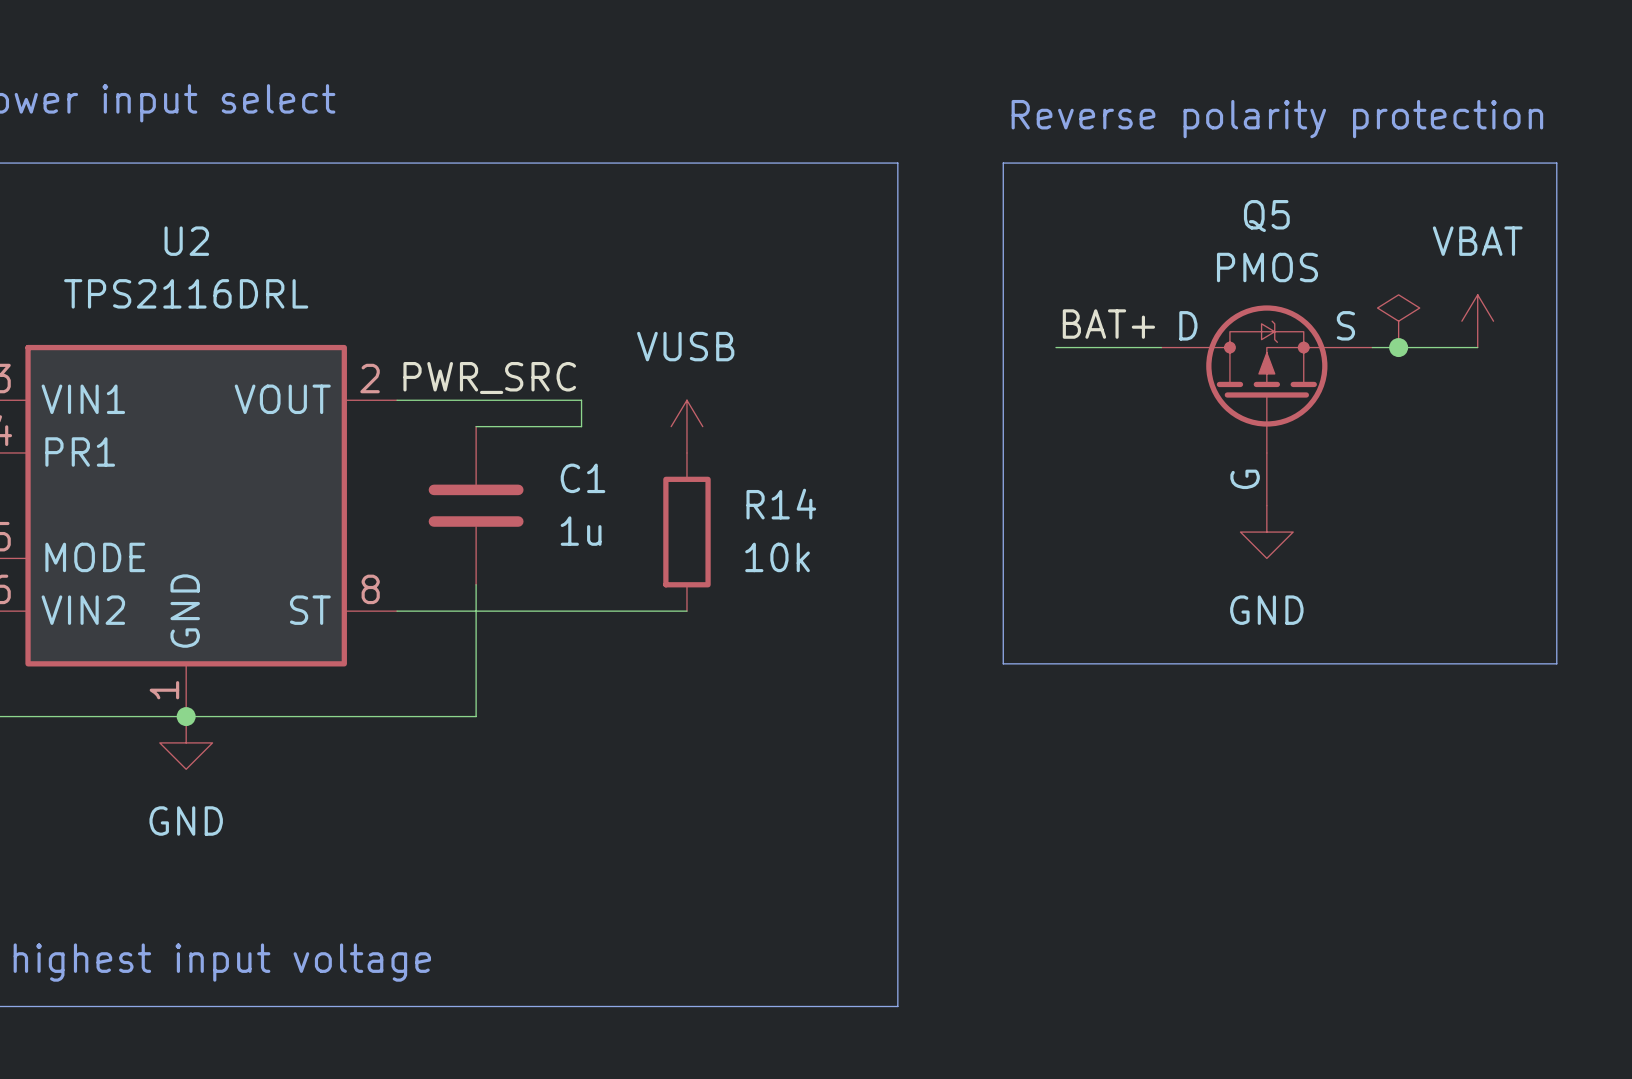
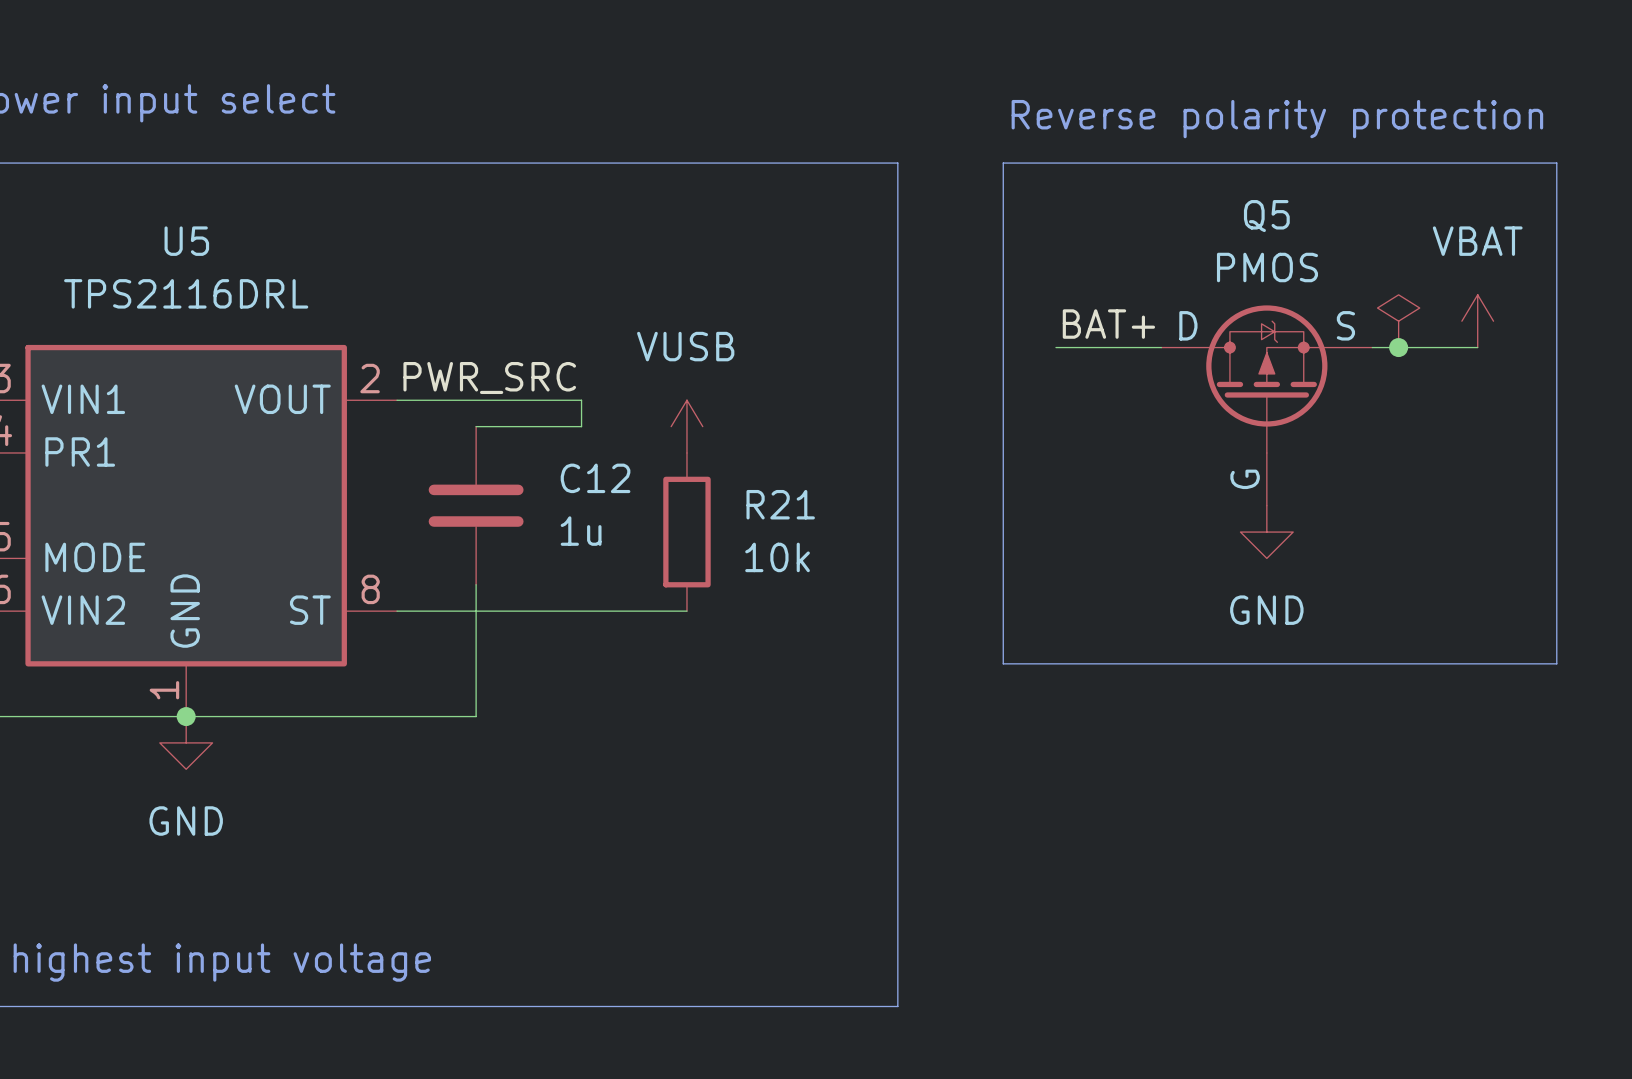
U2 name: U2 (186, 241) -> U5 (186, 241)
C1 name: C1 (582, 478) -> C12 (595, 478)
R14 name: R14 (781, 504) -> R21 (780, 504)

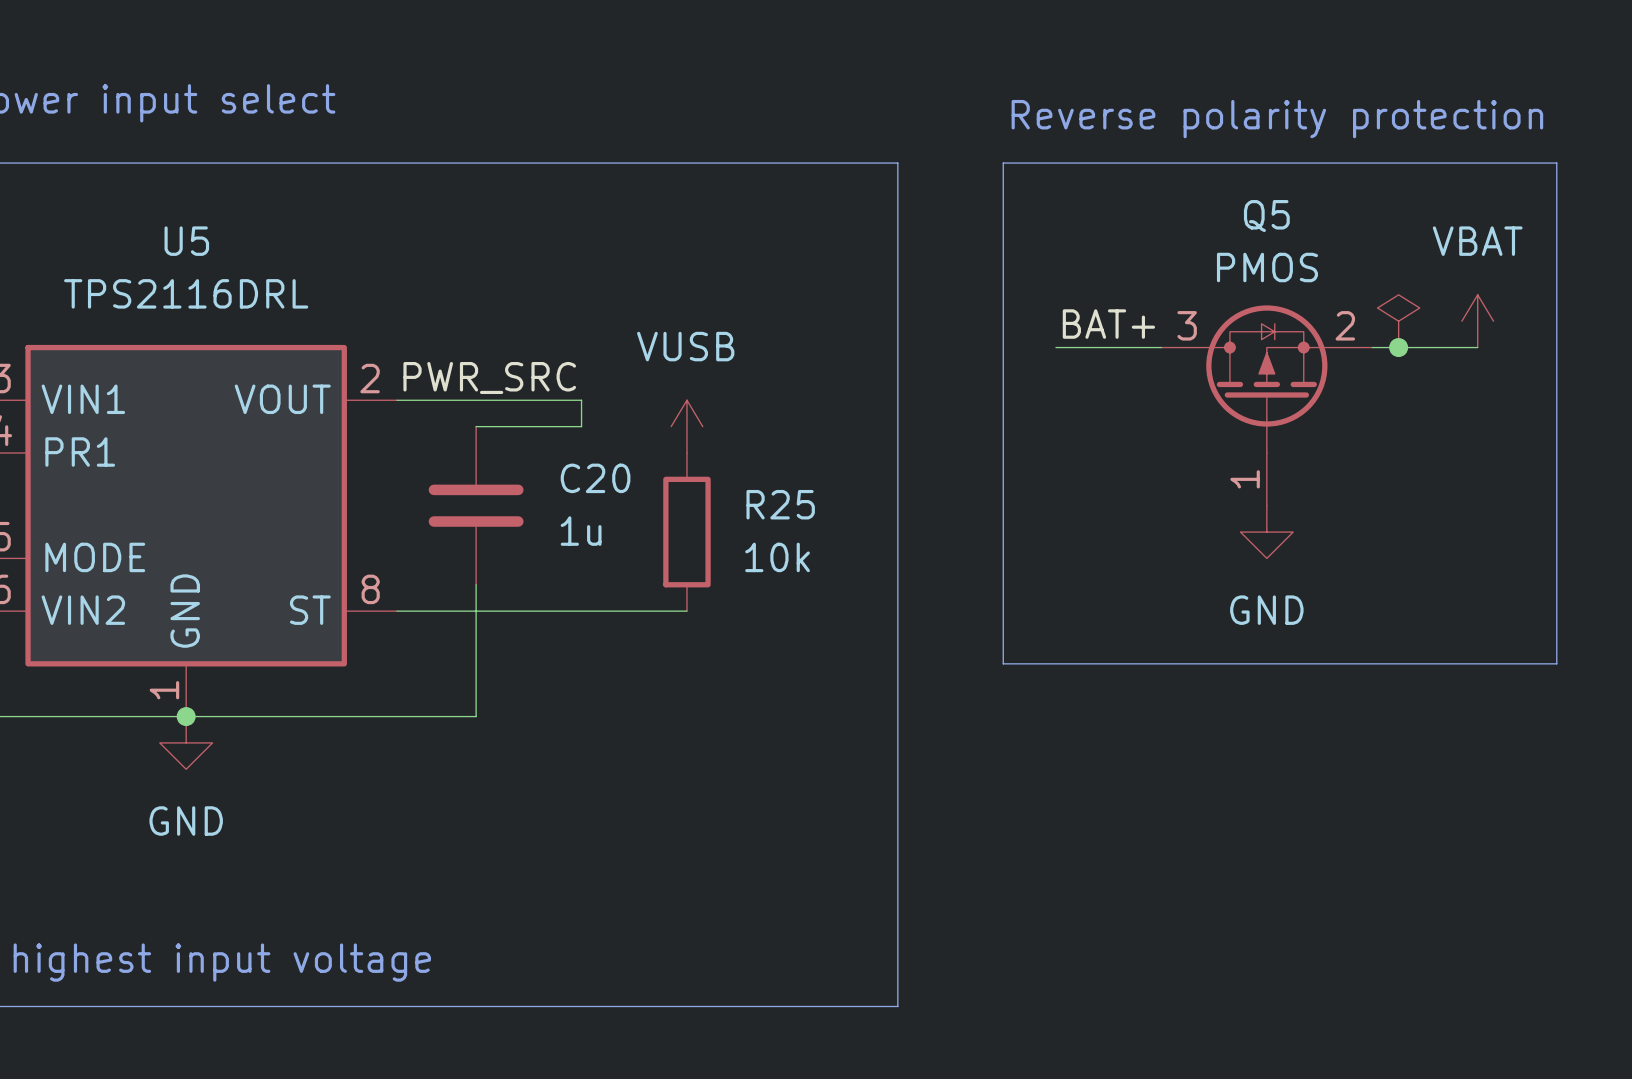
Q5 symbol: [1161, 305, 1373, 506] -> [1161, 305, 1373, 506]
C12 name: C12 (595, 478) -> C20 (595, 478)
R21 name: R21 (780, 504) -> R25 (780, 504)

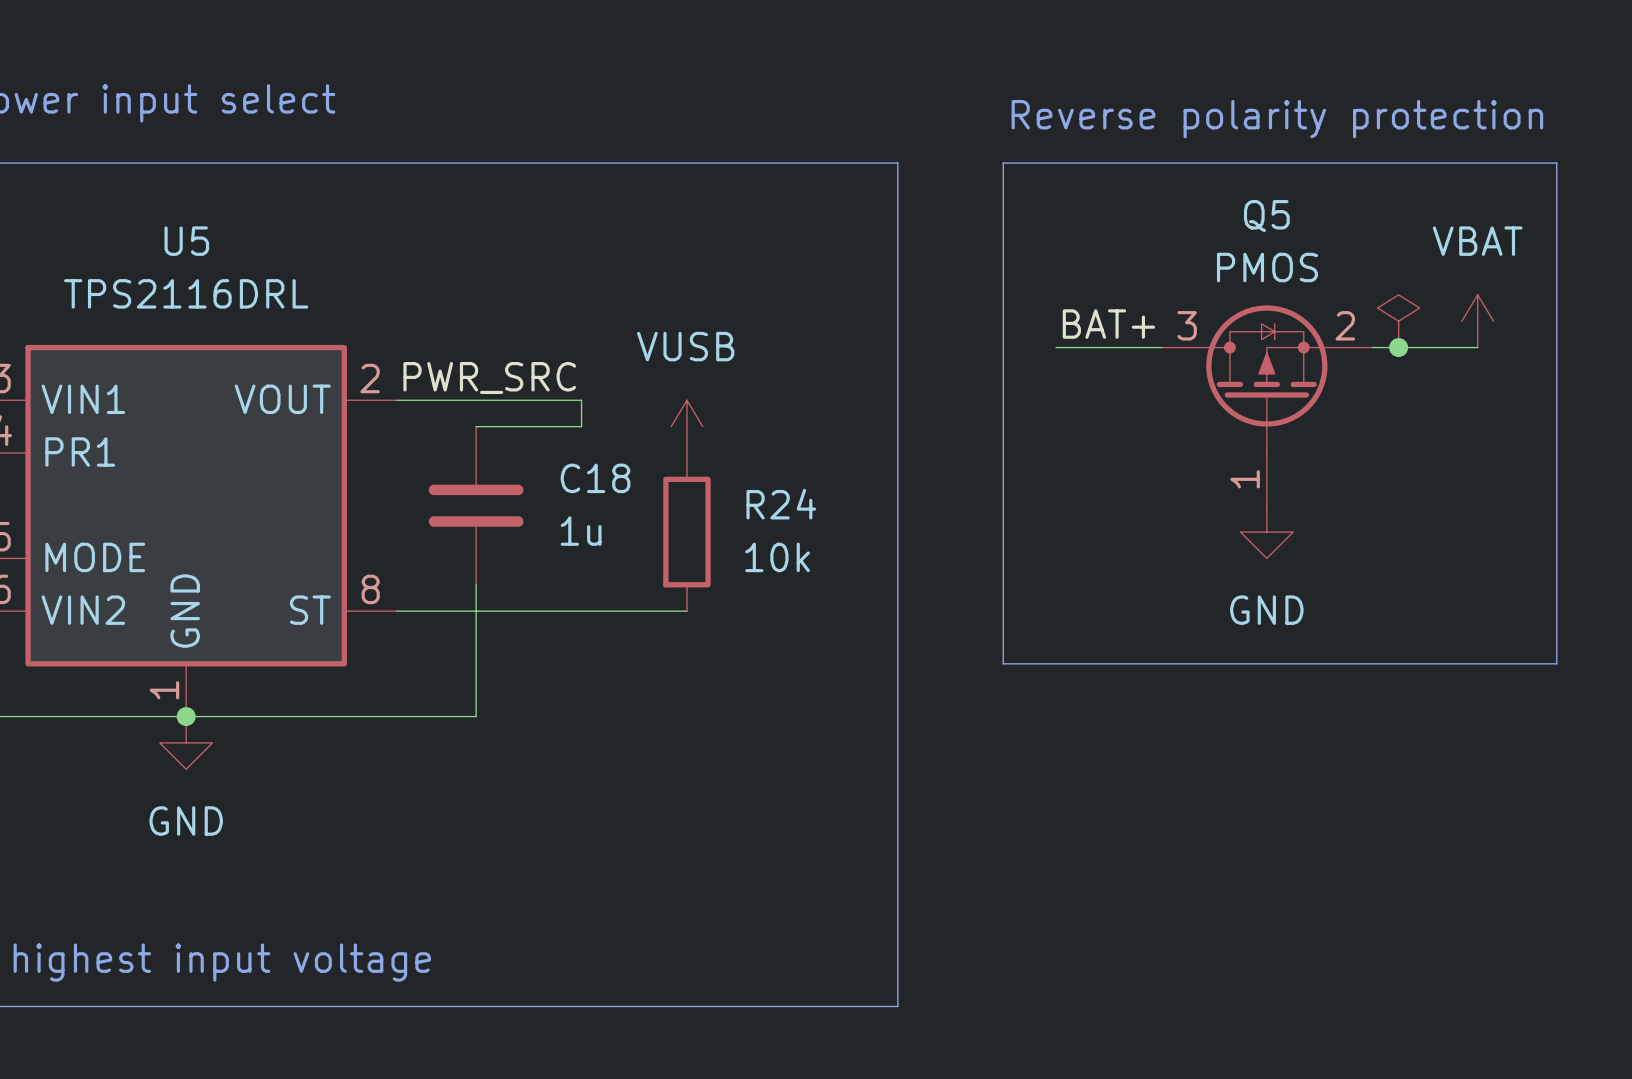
C20 name: C20 (595, 478) -> C18 (595, 478)
R25 name: R25 (780, 504) -> R24 (781, 504)

